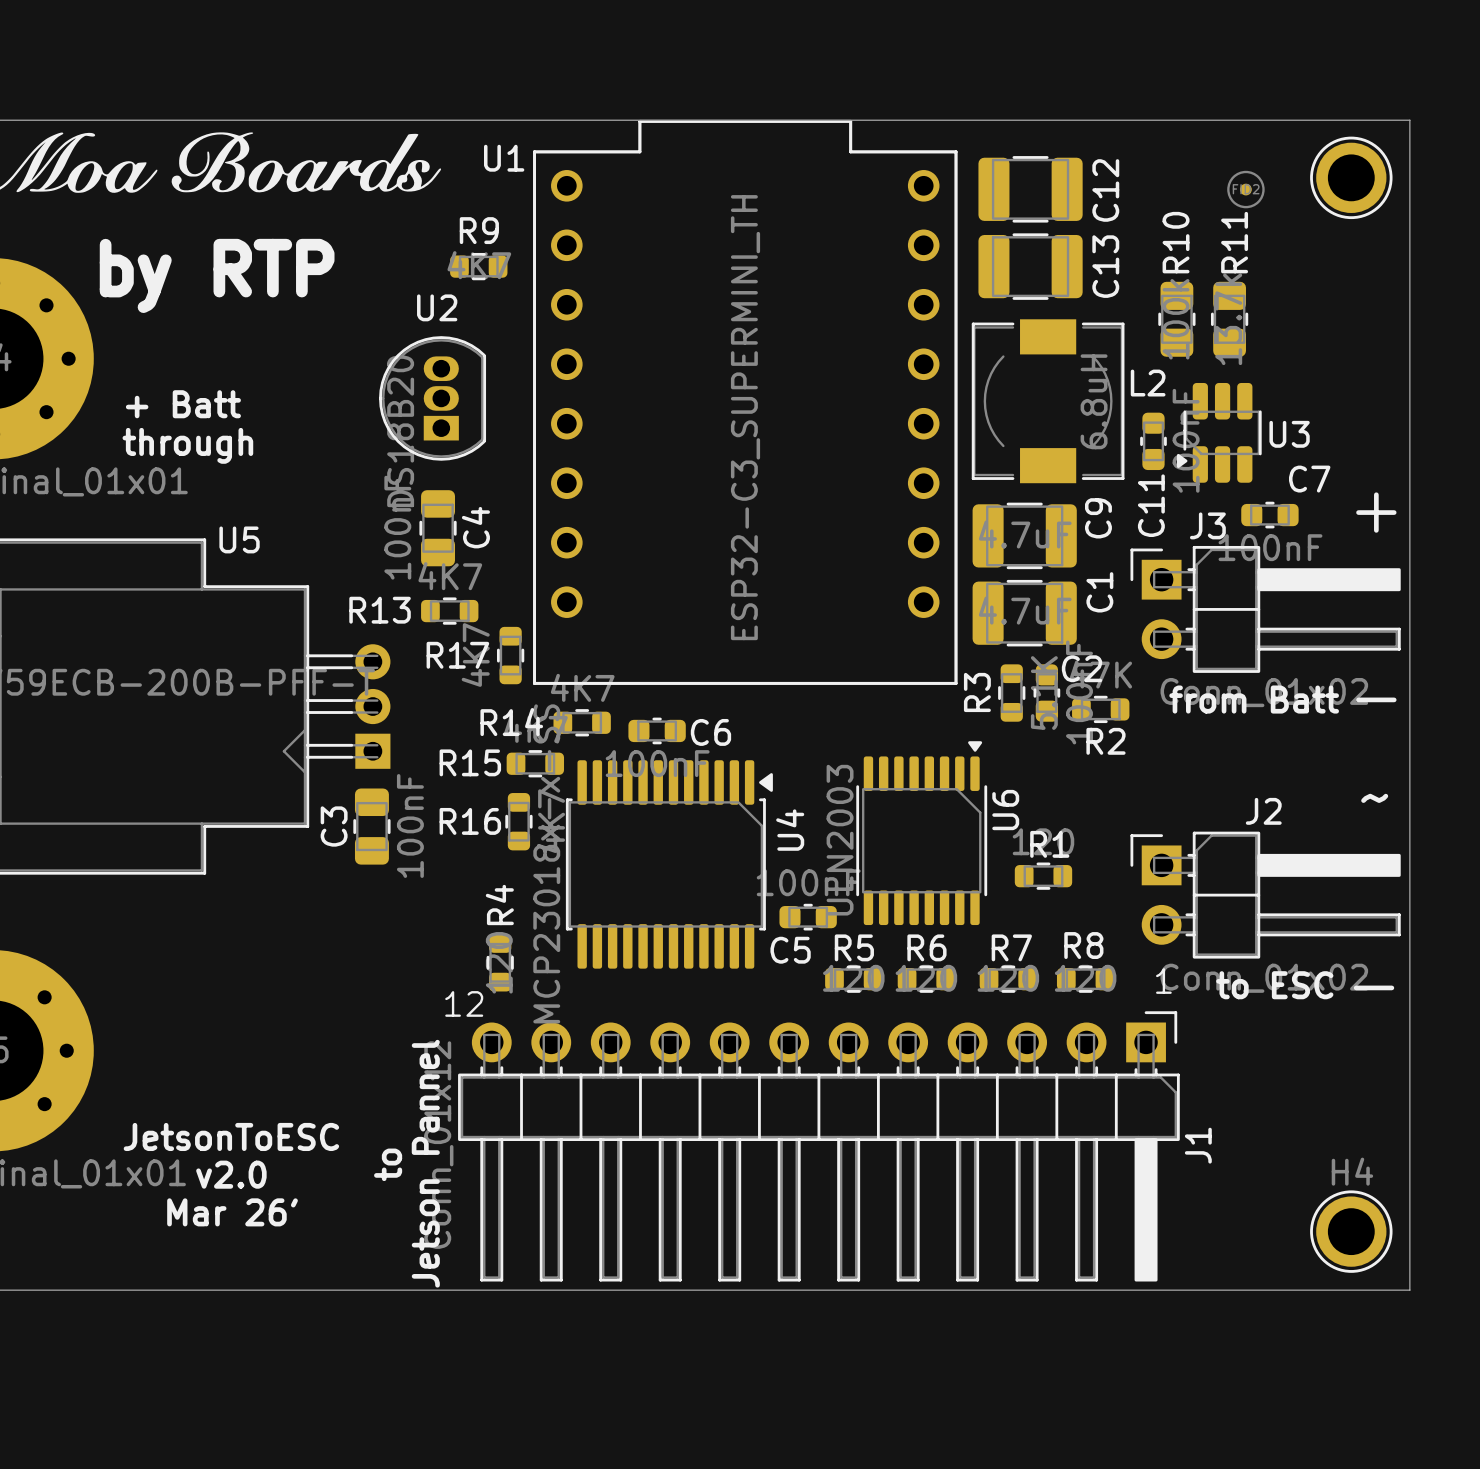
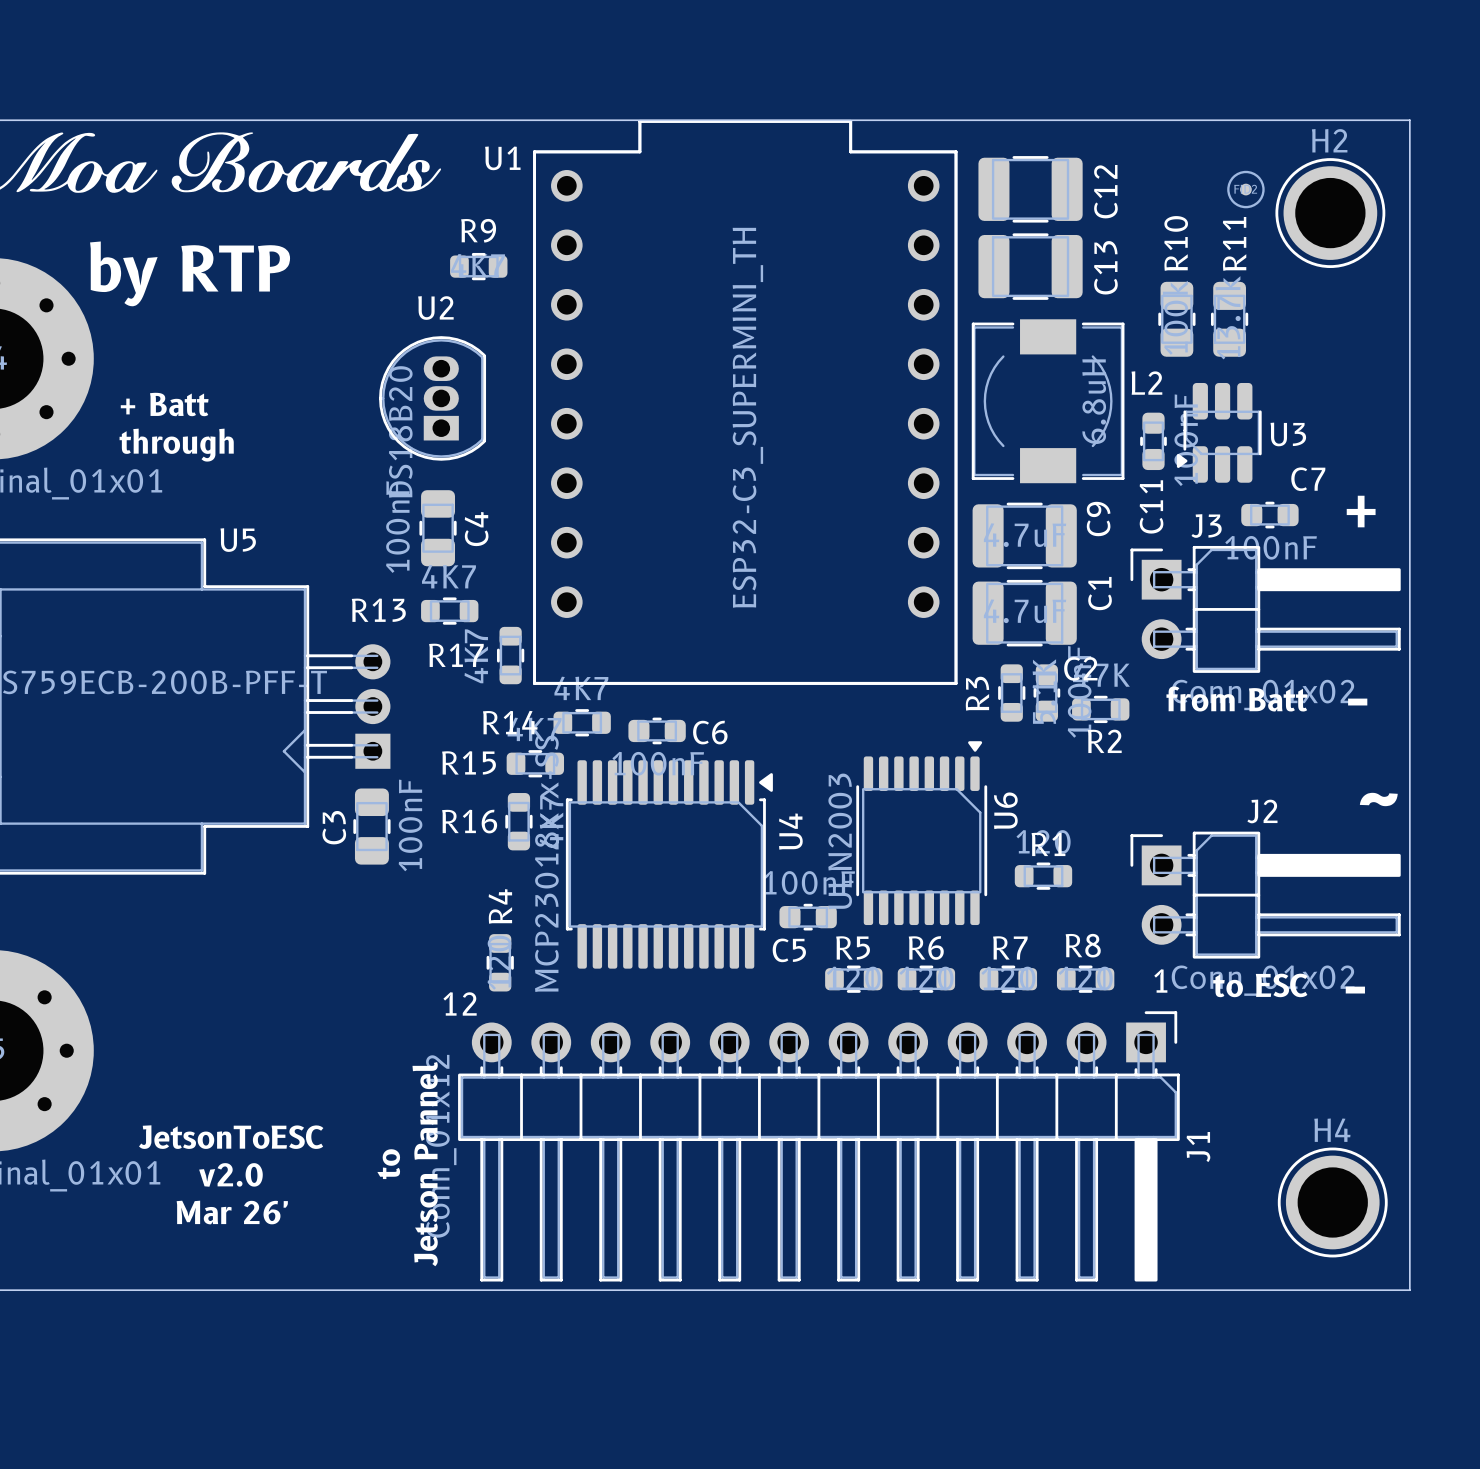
part: (1351, 177) -> none
H2: none -> (1330, 213)
H4 footprint: [1310, 1190, 1393, 1273] -> [1277, 1147, 1388, 1258]

